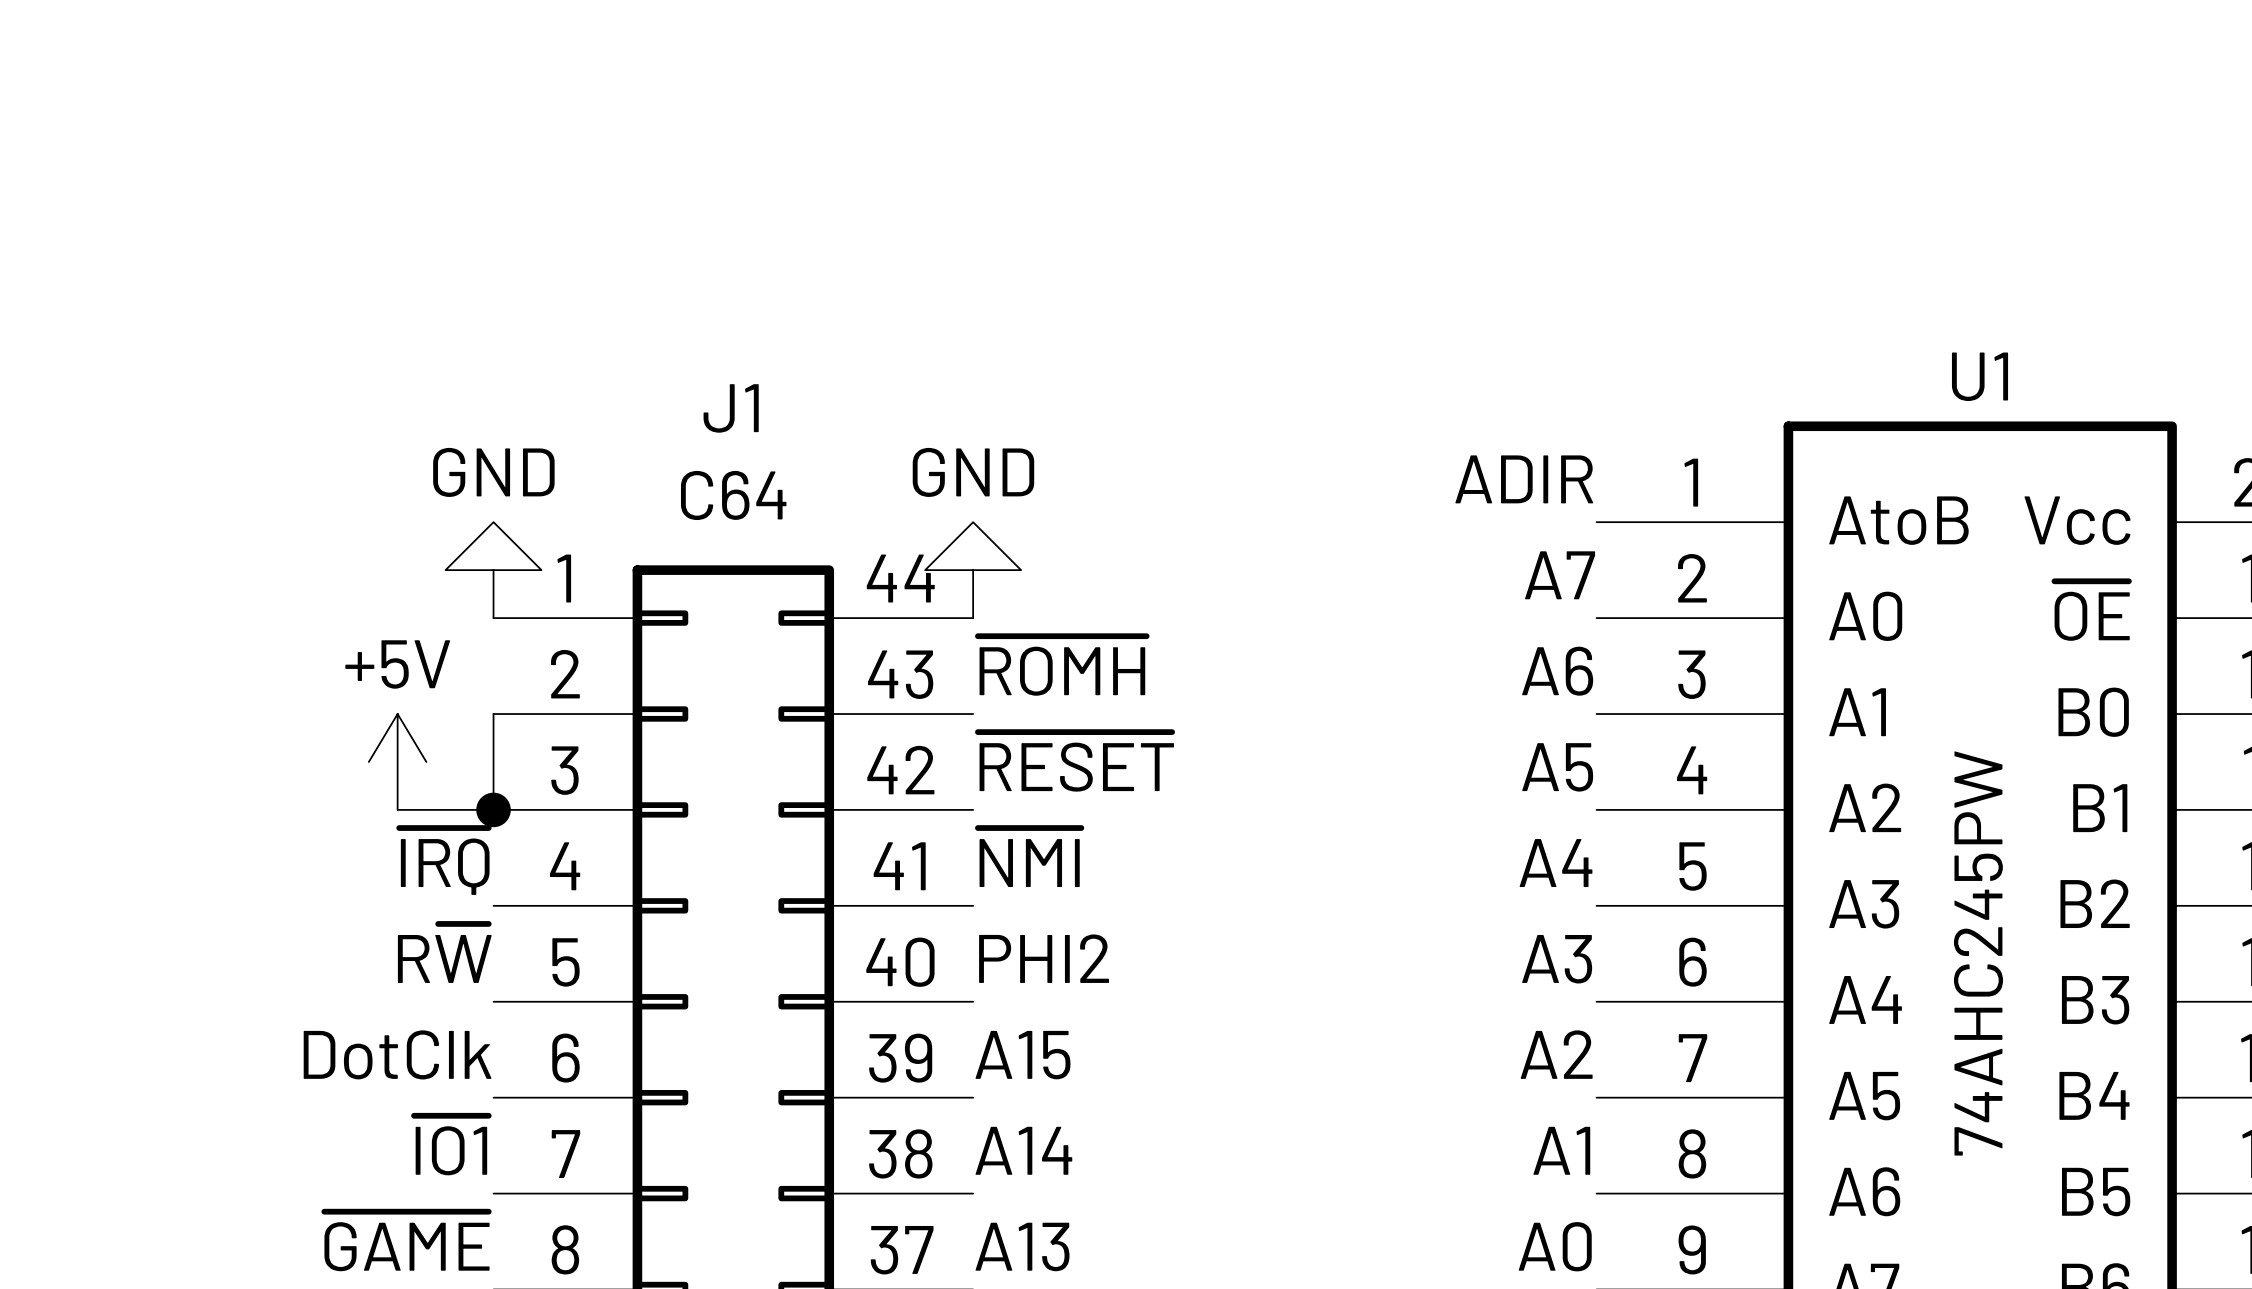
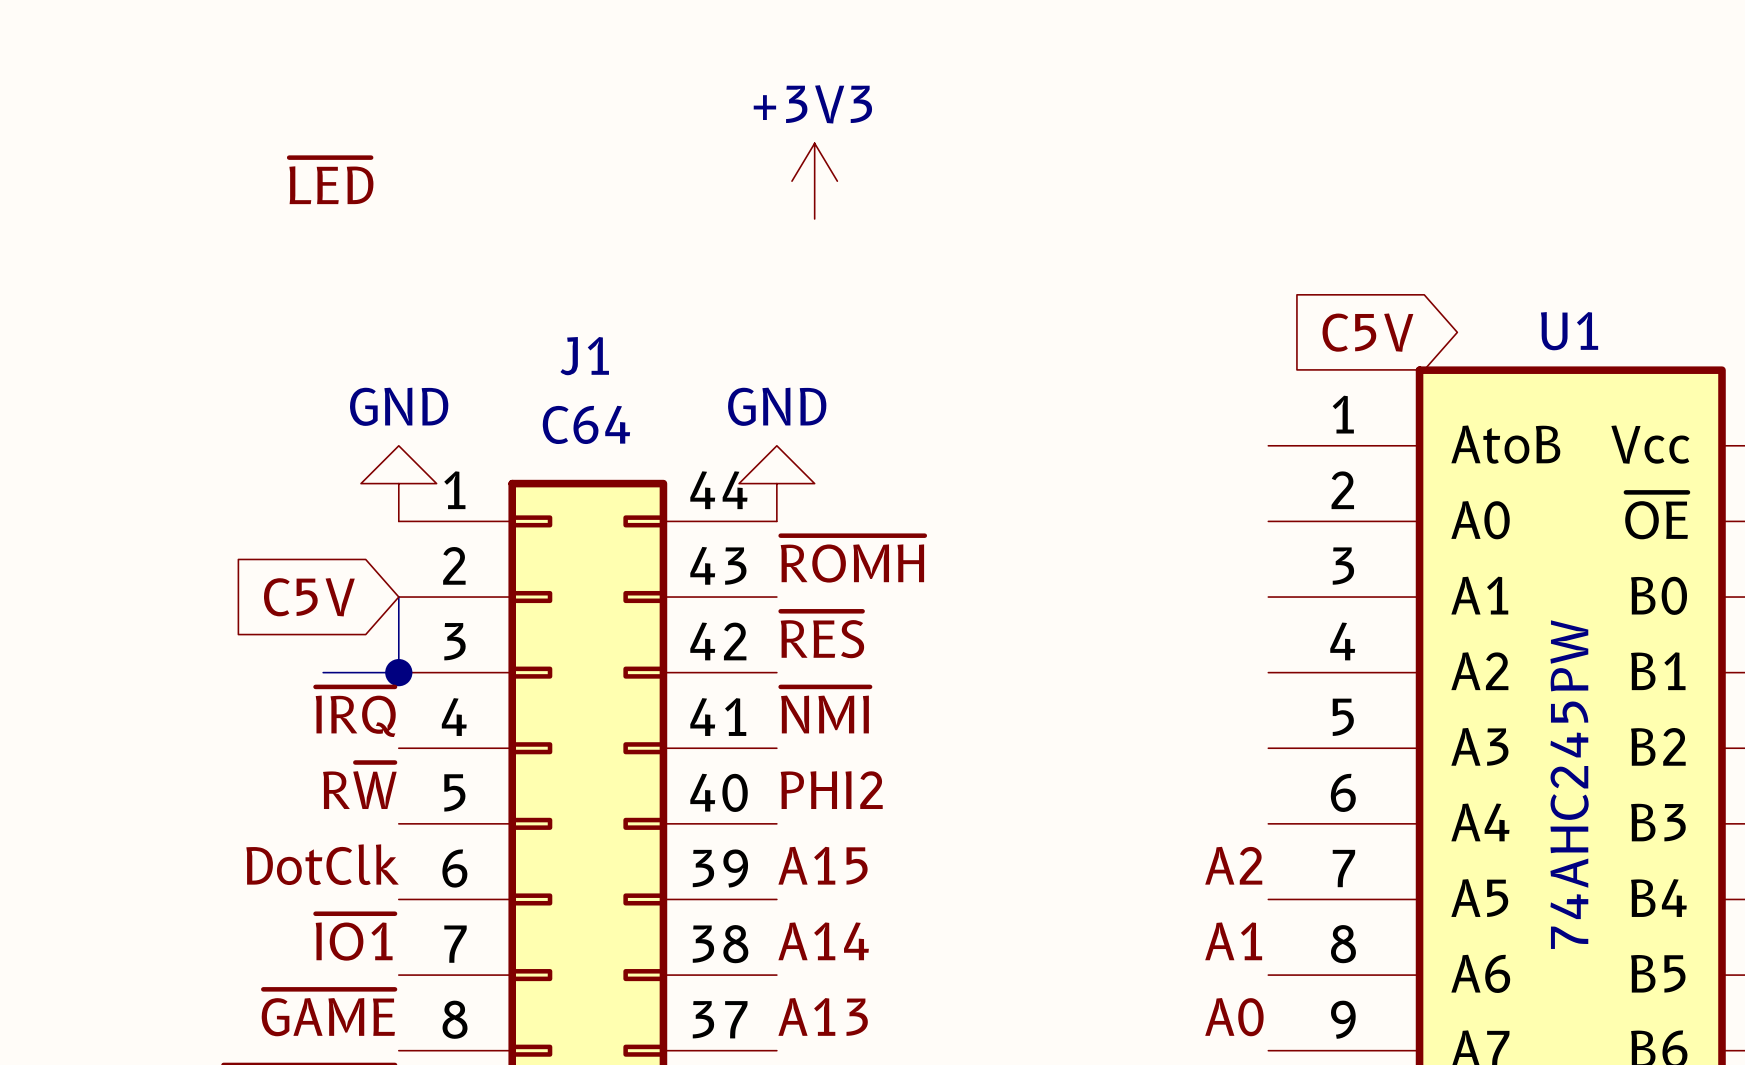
label: none -> ~{LED} (331, 180)
power symbol: none -> +3V3 (814, 181)
global label: none -> C5V (1367, 332)
label: ADIR (1524, 479) -> none
label: A7 (1559, 575) -> none
label: A6 (1557, 671) -> none
global label: none -> C5V (309, 597)
power symbol: +5V (397, 761) -> none
label: ~{RESET} (1075, 761) -> ~{RES} (822, 634)
label: A5 (1557, 767) -> none
label: A4 (1555, 863) -> none
label: A3 (1557, 959) -> none

